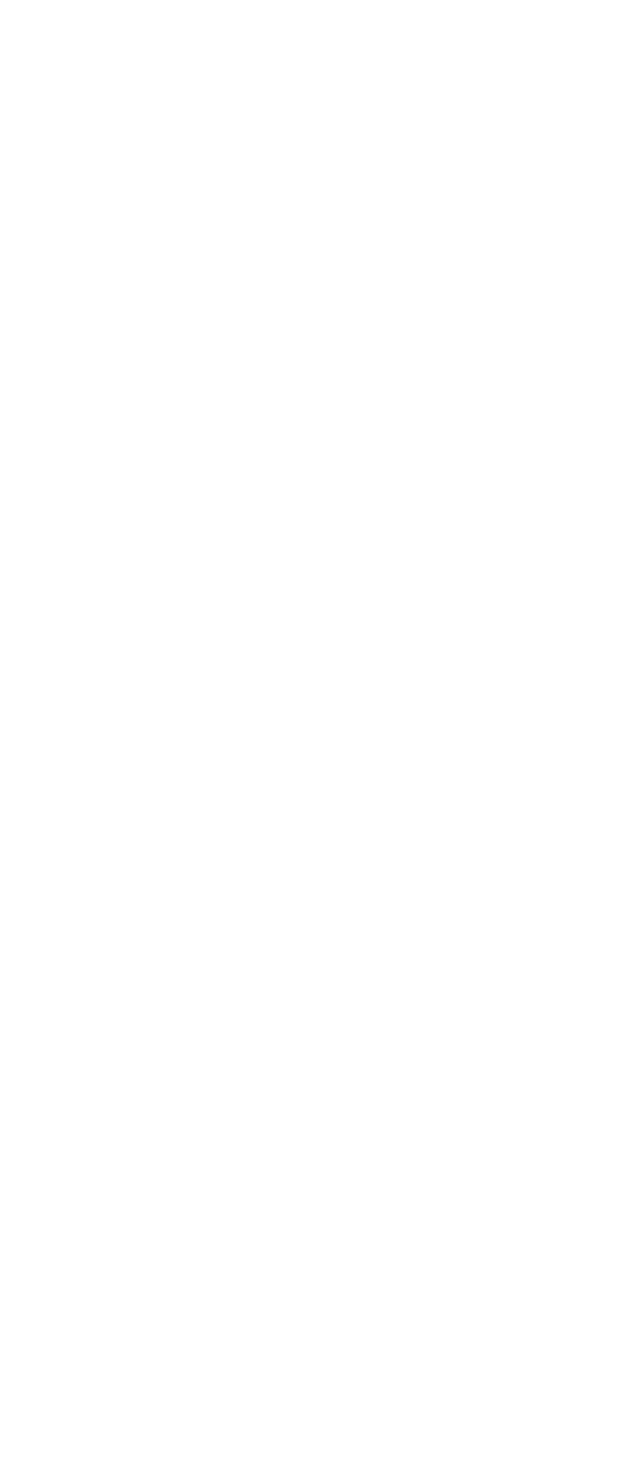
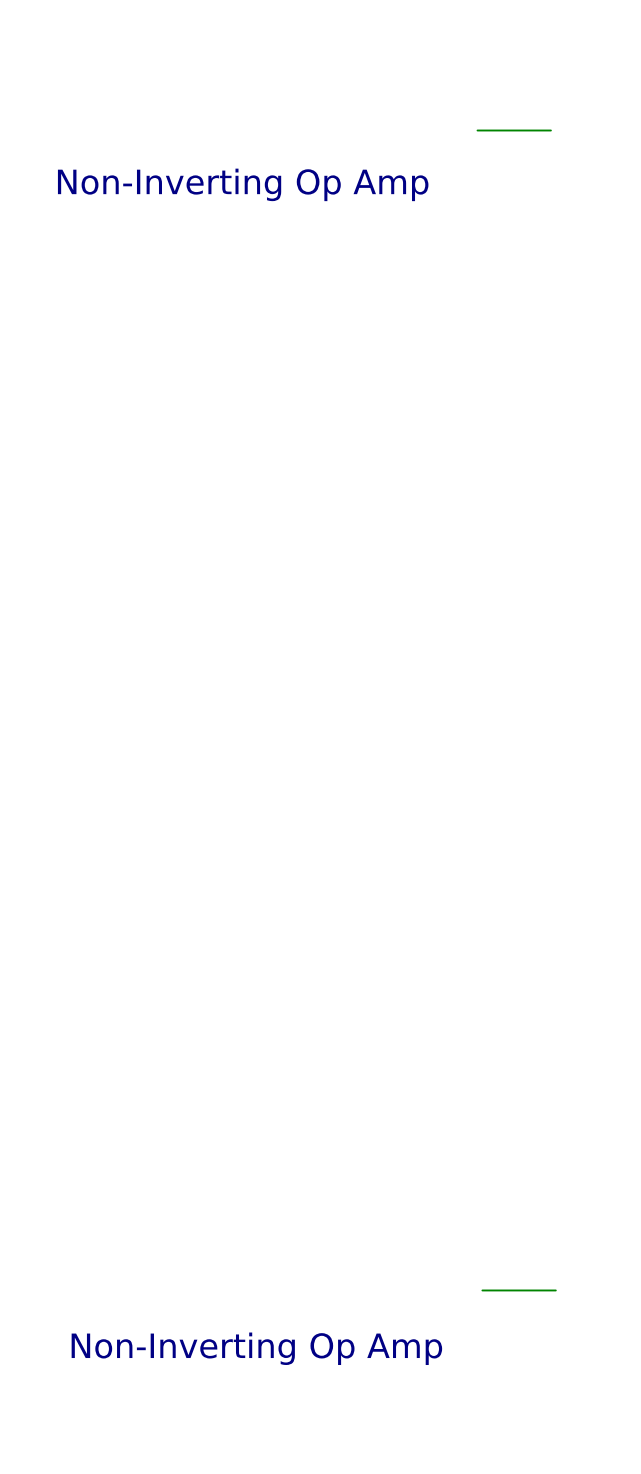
wire: none -> (477, 130) (550, 130)
text: none -> Non-Inverting Op Amp (243, 184)
wire: none -> (482, 1290) (555, 1290)
text: none -> Non-Inverting Op Amp (256, 1348)

